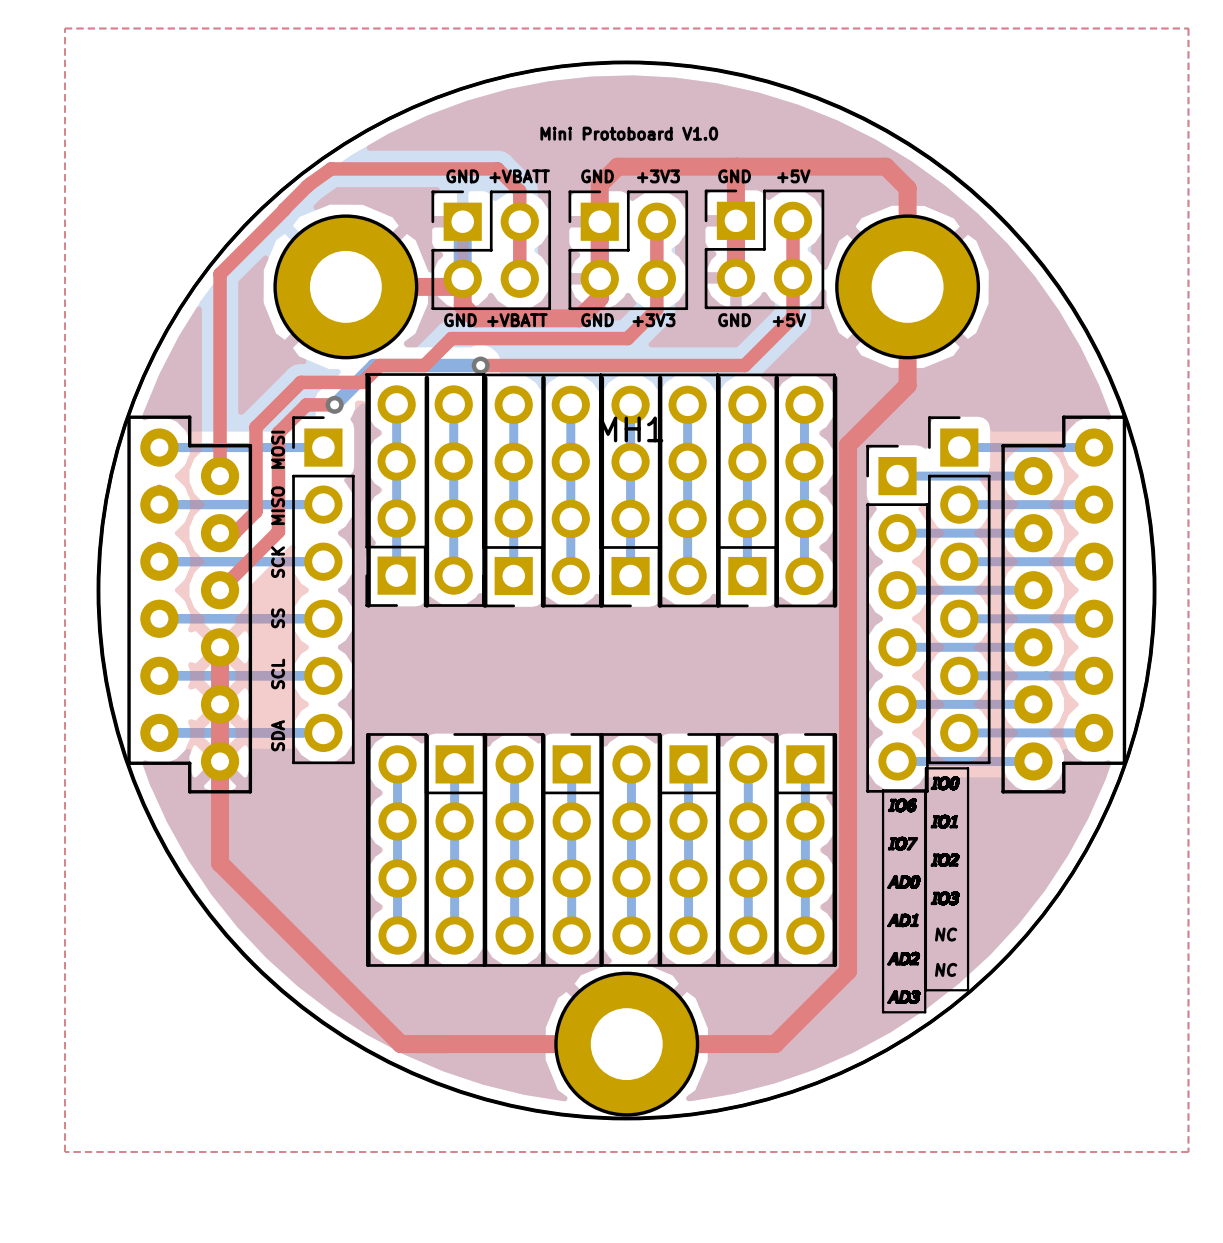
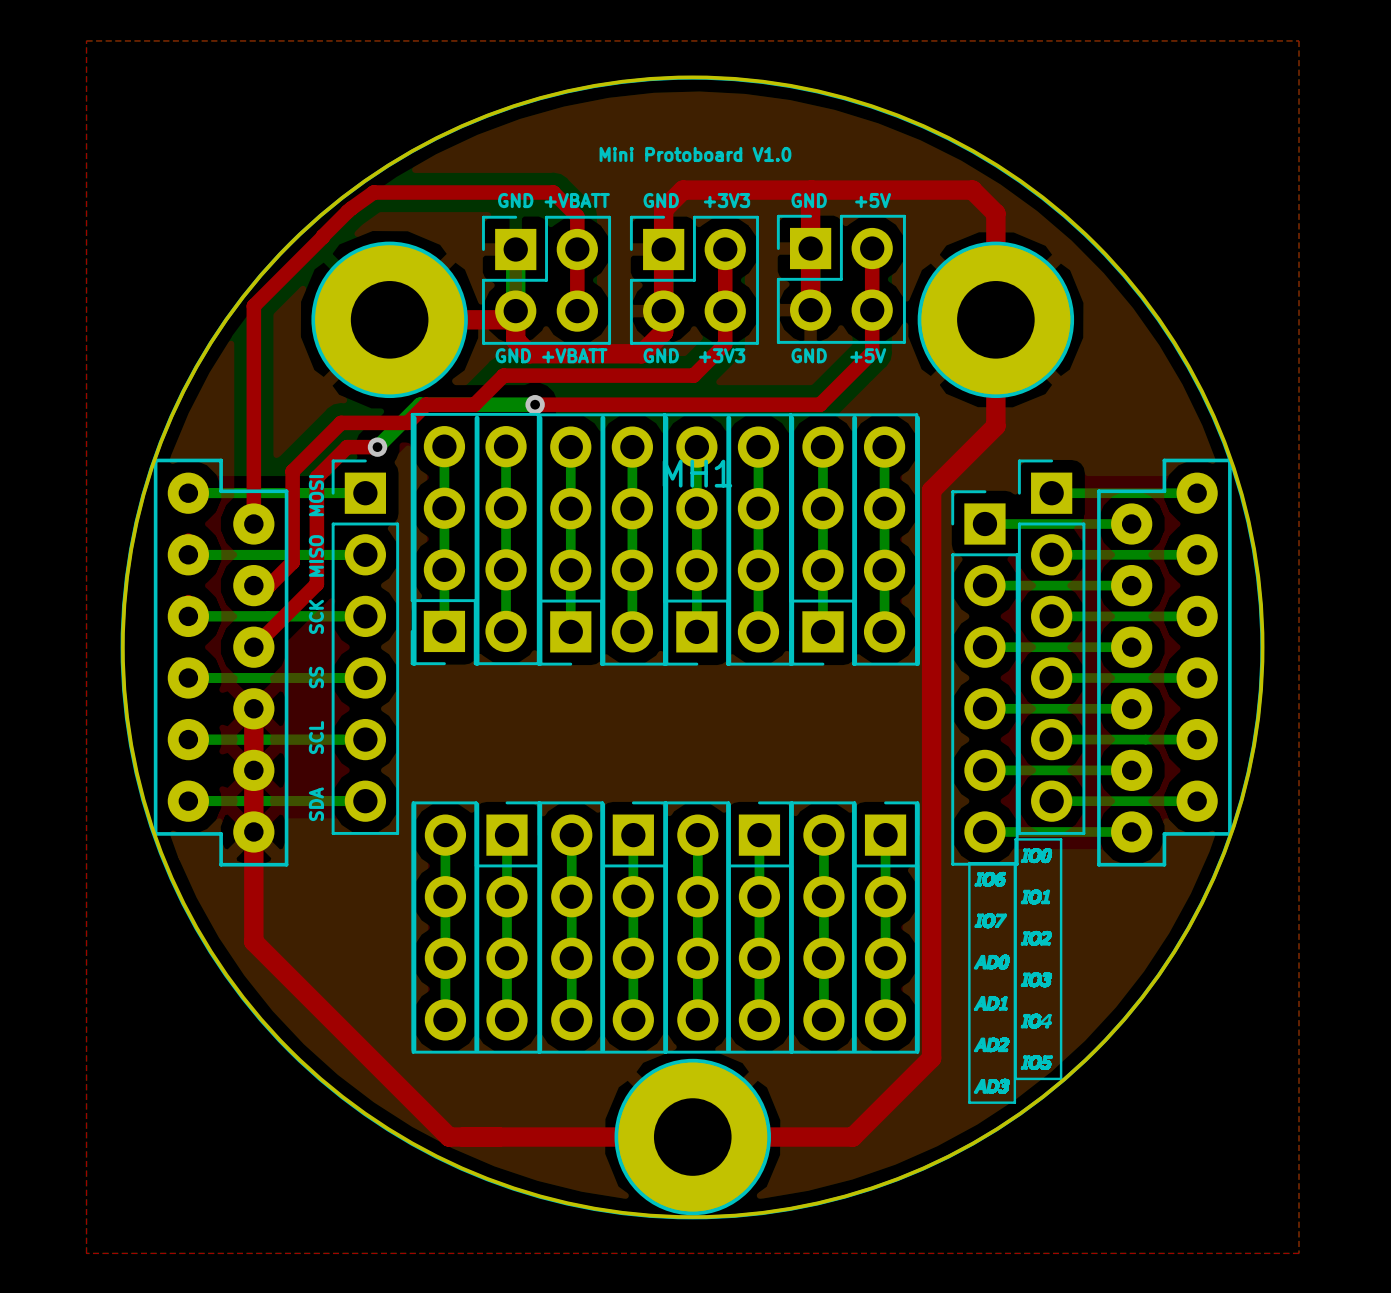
line: none -> (1024, 1015) (1029, 1015) (1026, 1027) (1022, 1027) (1024, 1015)
line: none -> (1048, 1015) (1050, 1023) (1046, 1027) (1047, 1023) (1041, 1023) (1041, 1021) (1048, 1015)
text: NC (946, 934) -> none
line: none -> (1024, 1056) (1029, 1056) (1026, 1068) (1022, 1068) (1024, 1056)
text: NC (946, 969) -> none
line: none -> (1045, 1061) (1045, 1057) (1051, 1056) (1044, 1056) (1043, 1062)

